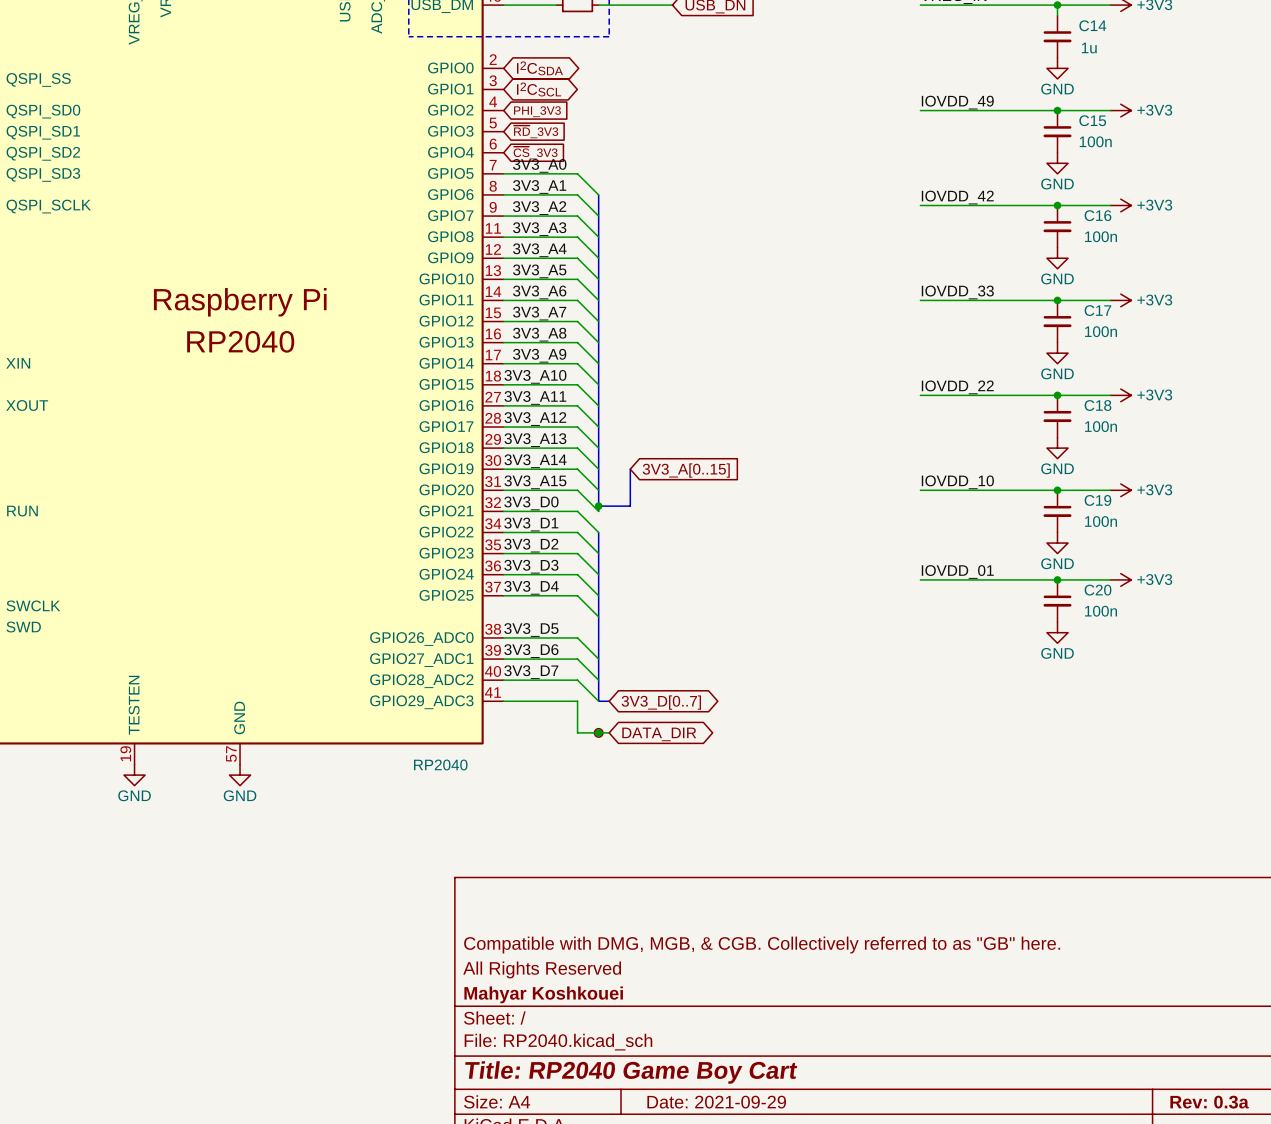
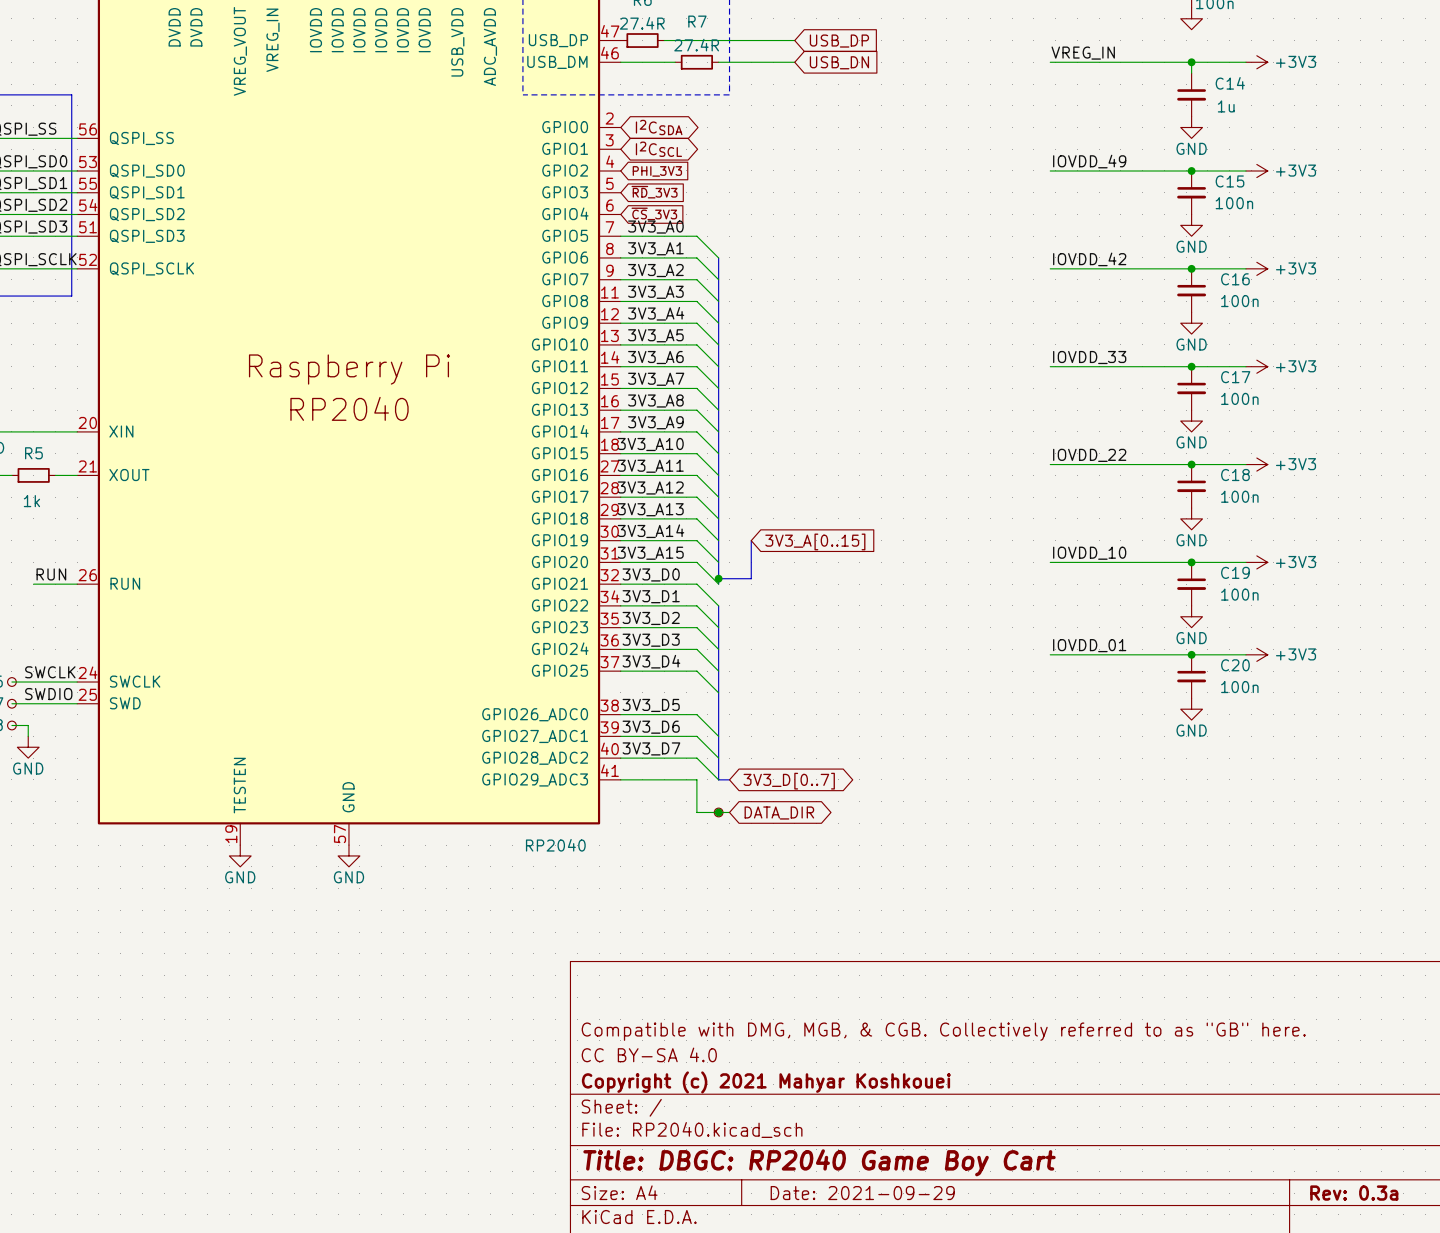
title block: All Rights Reserved (542, 969) -> CC BY-SA 4.0 (649, 1054)
title block: Mahyar Koshkouei (543, 994) -> Copyright (c) 2021 Mahyar Koshkouei (766, 1082)
title block: Title: RP2040 Game Boy Cart (631, 1072) -> Title: DBGC: RP2040 Game Boy Cart (819, 1162)

